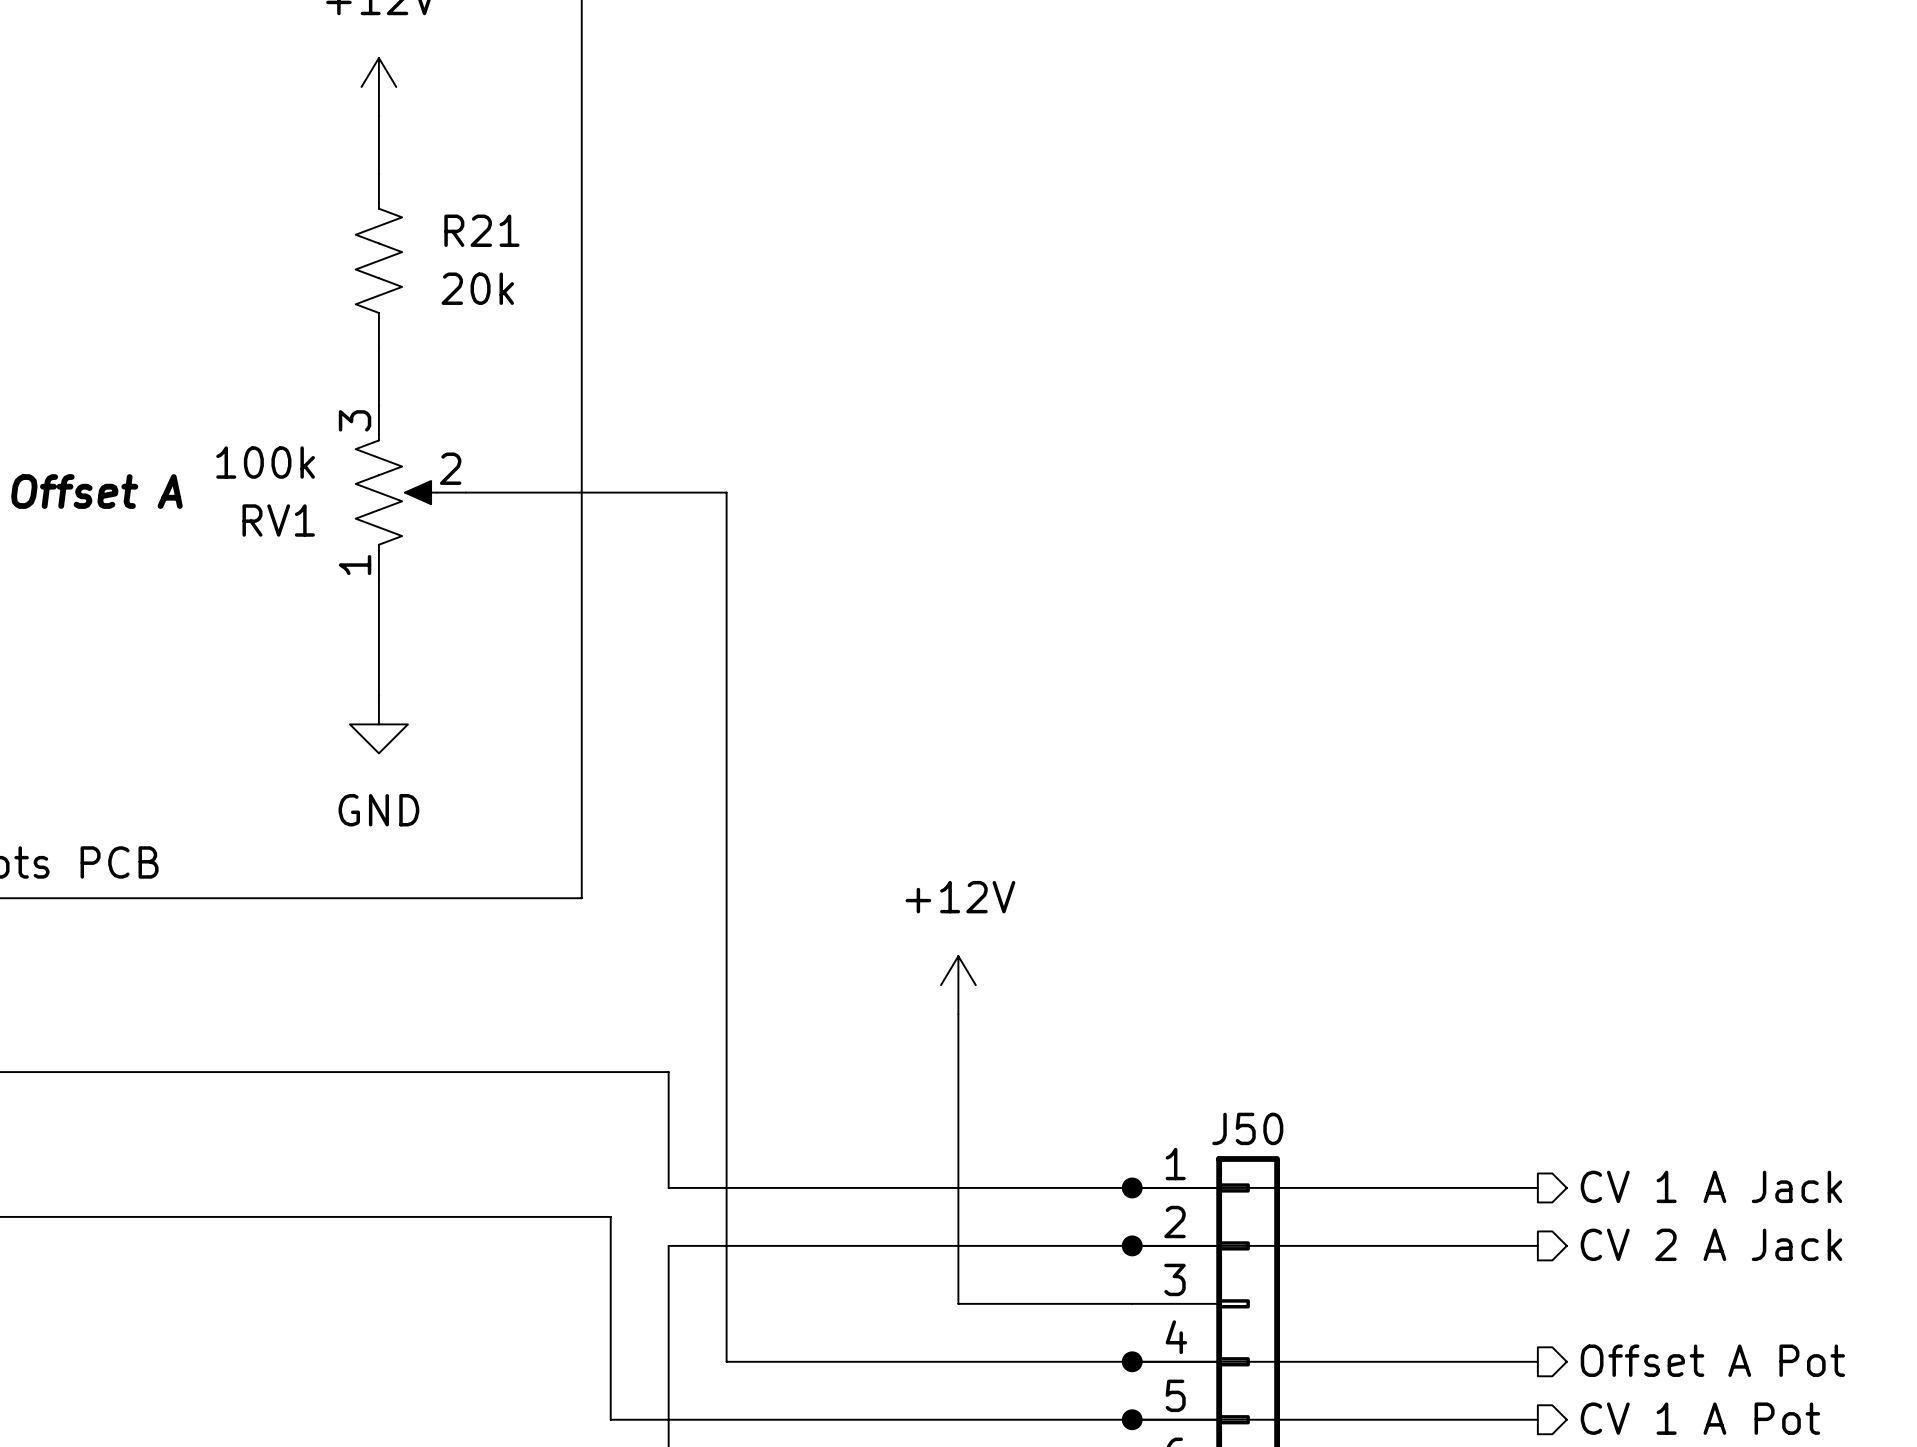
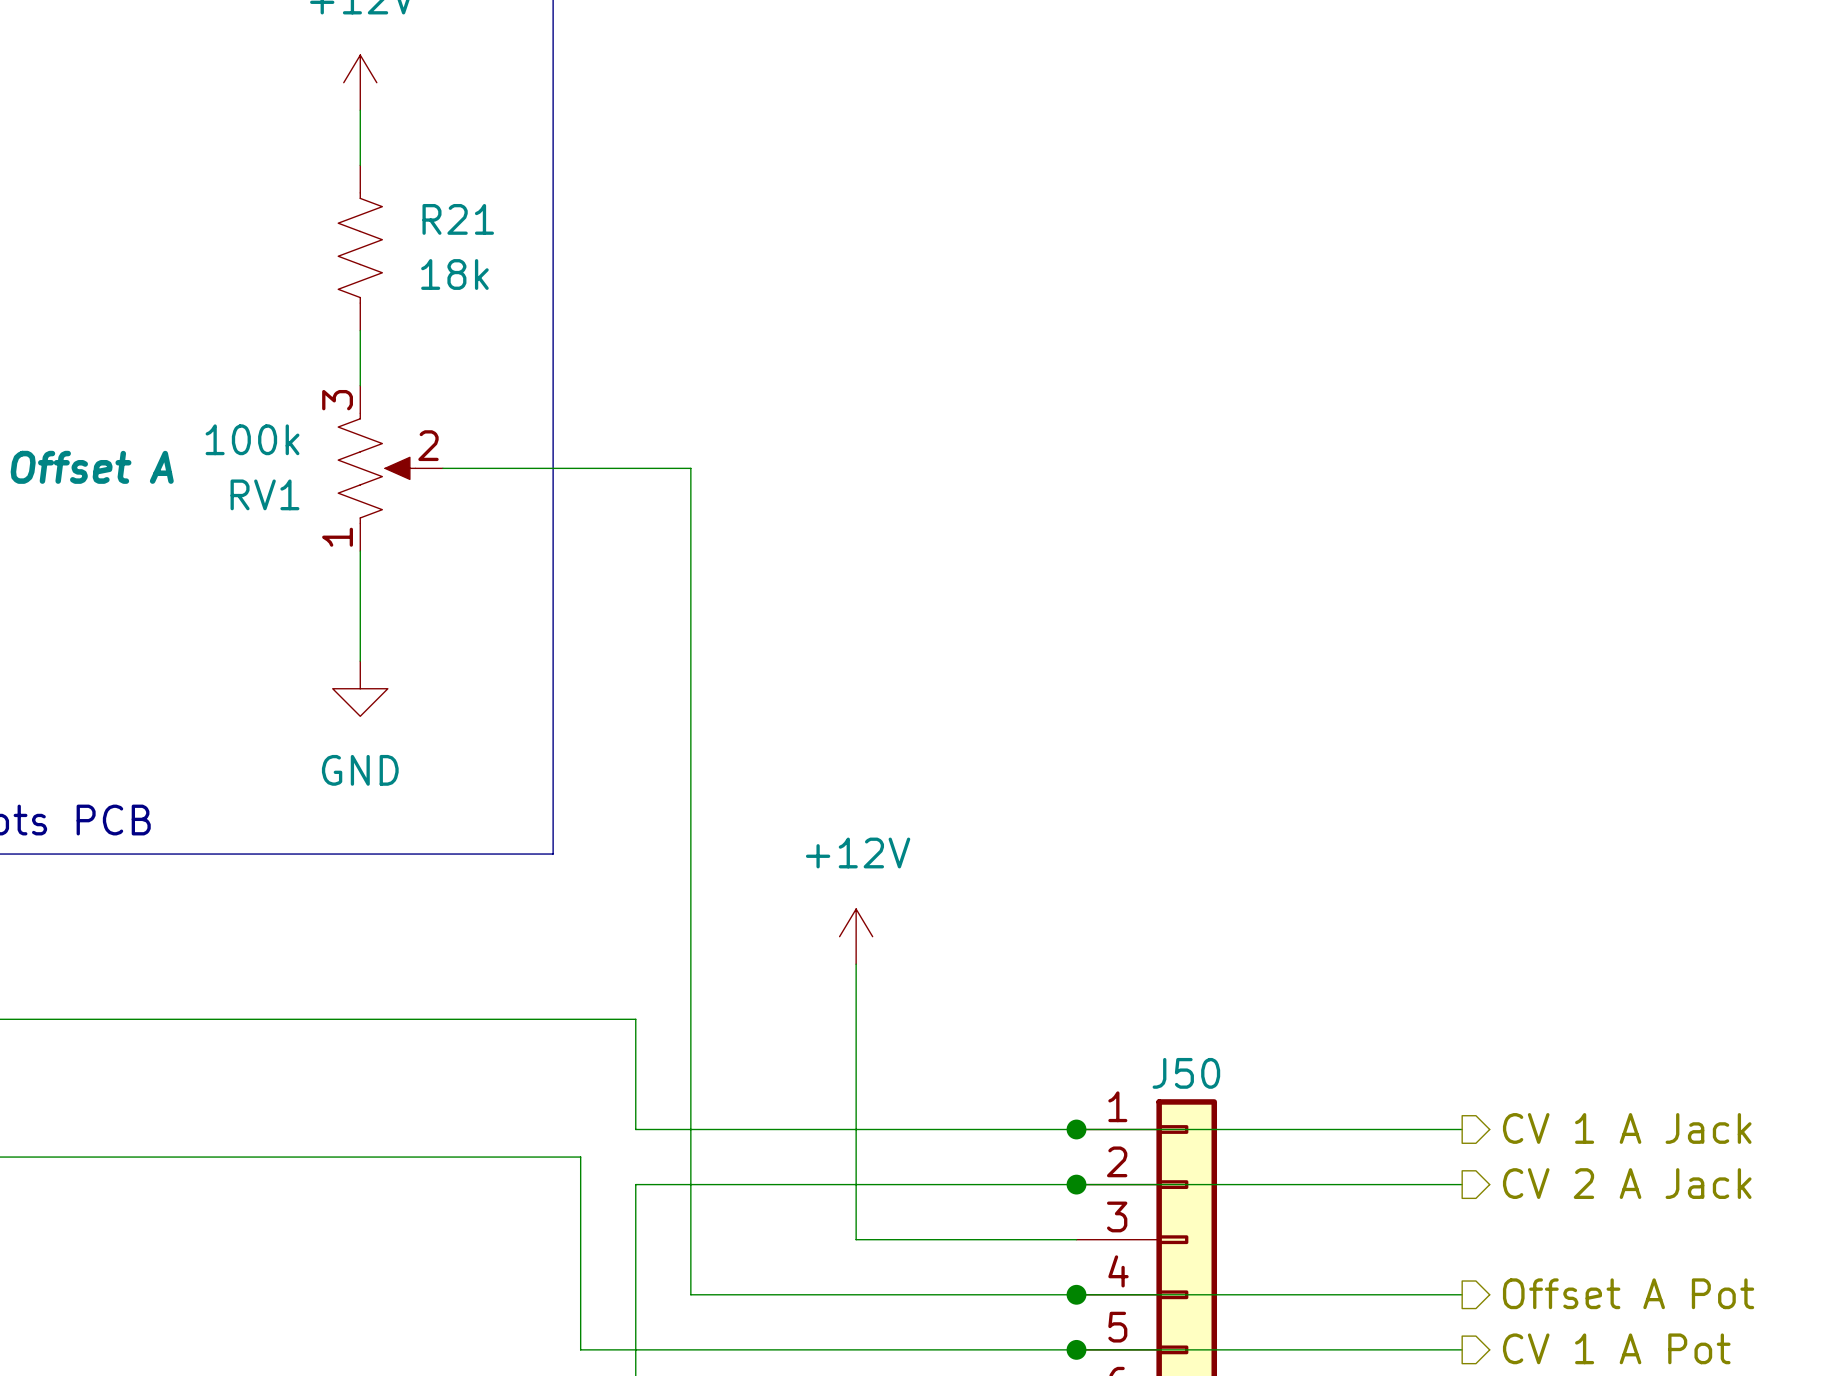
R21 value: 20k (477, 288) -> 18k (454, 274)
power symbol position: +12V (958, 985) -> +12V (856, 936)
wire: (958, 1014) (958, 1303) -> (856, 964) (856, 1239) (911, 1239)

